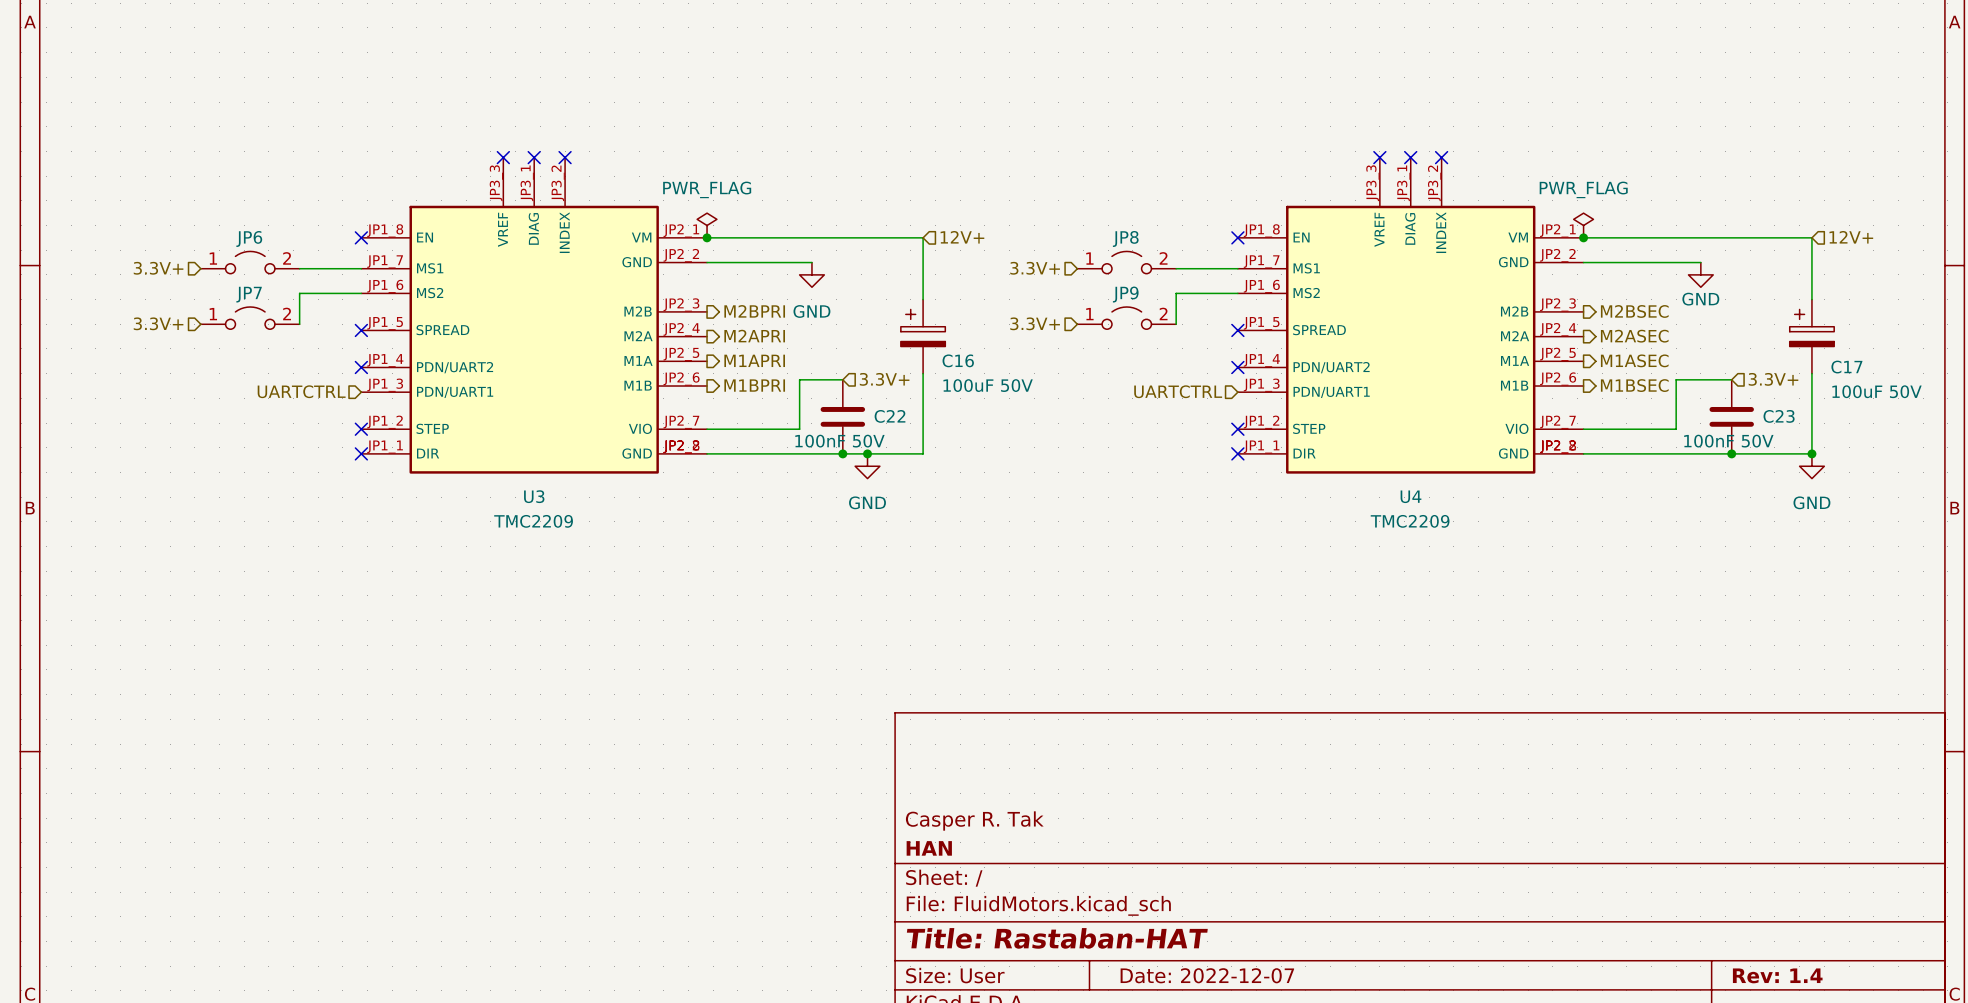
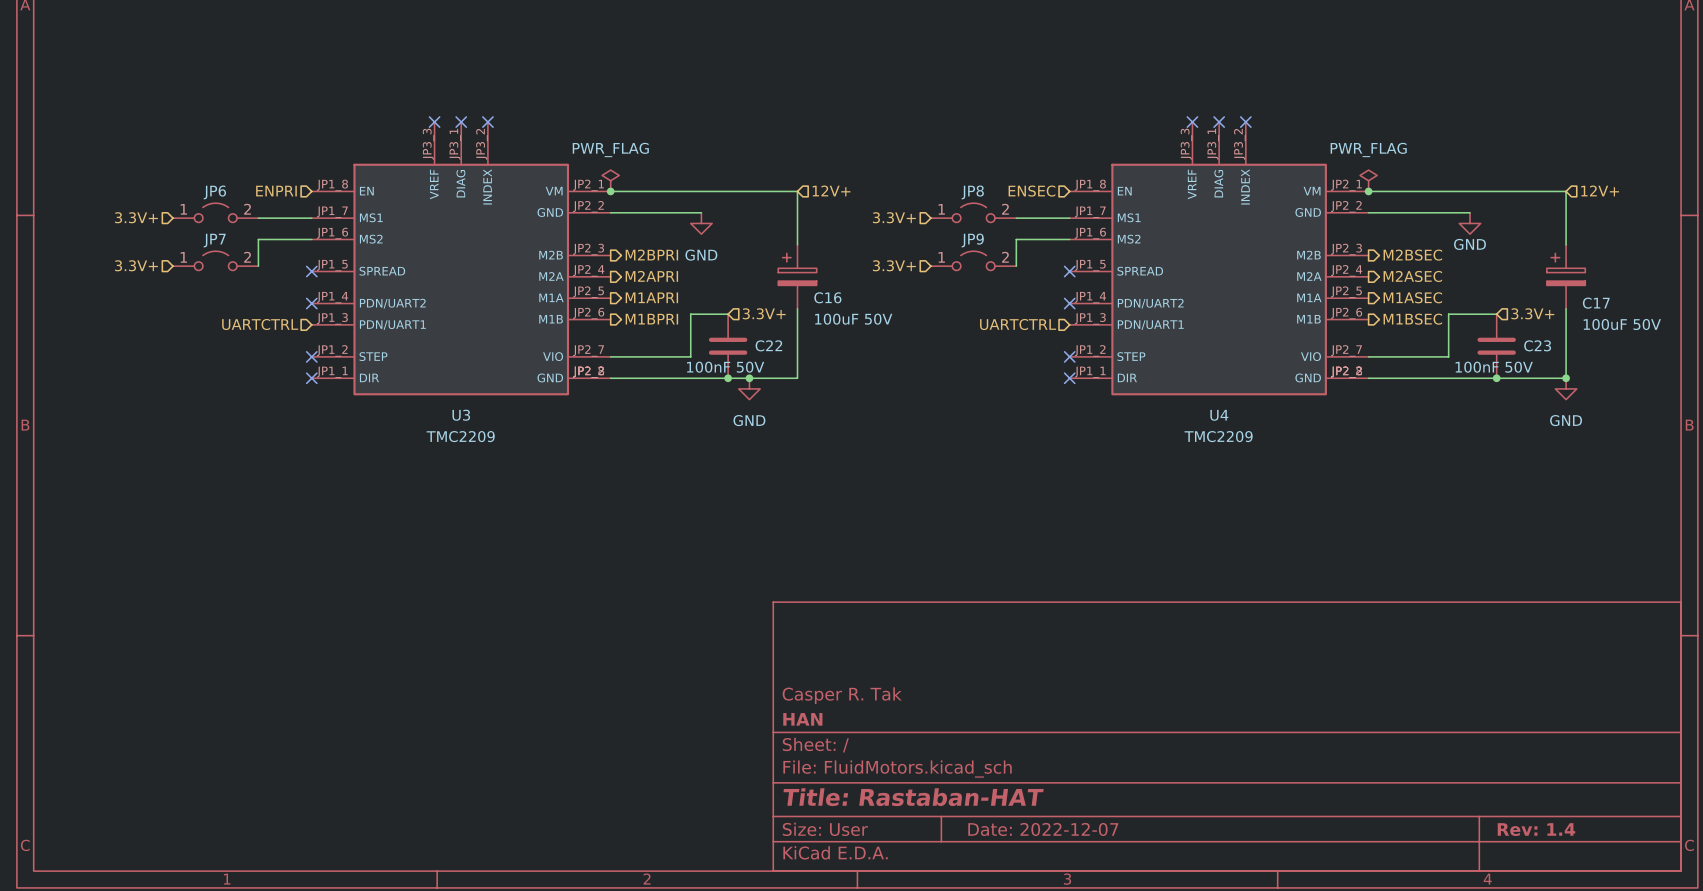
hierarchical label: none -> ENPRI (276, 191)
no-connect mark: (361, 237) -> none
hierarchical label: none -> ENSEC (1031, 191)
no-connect mark: (1237, 237) -> none

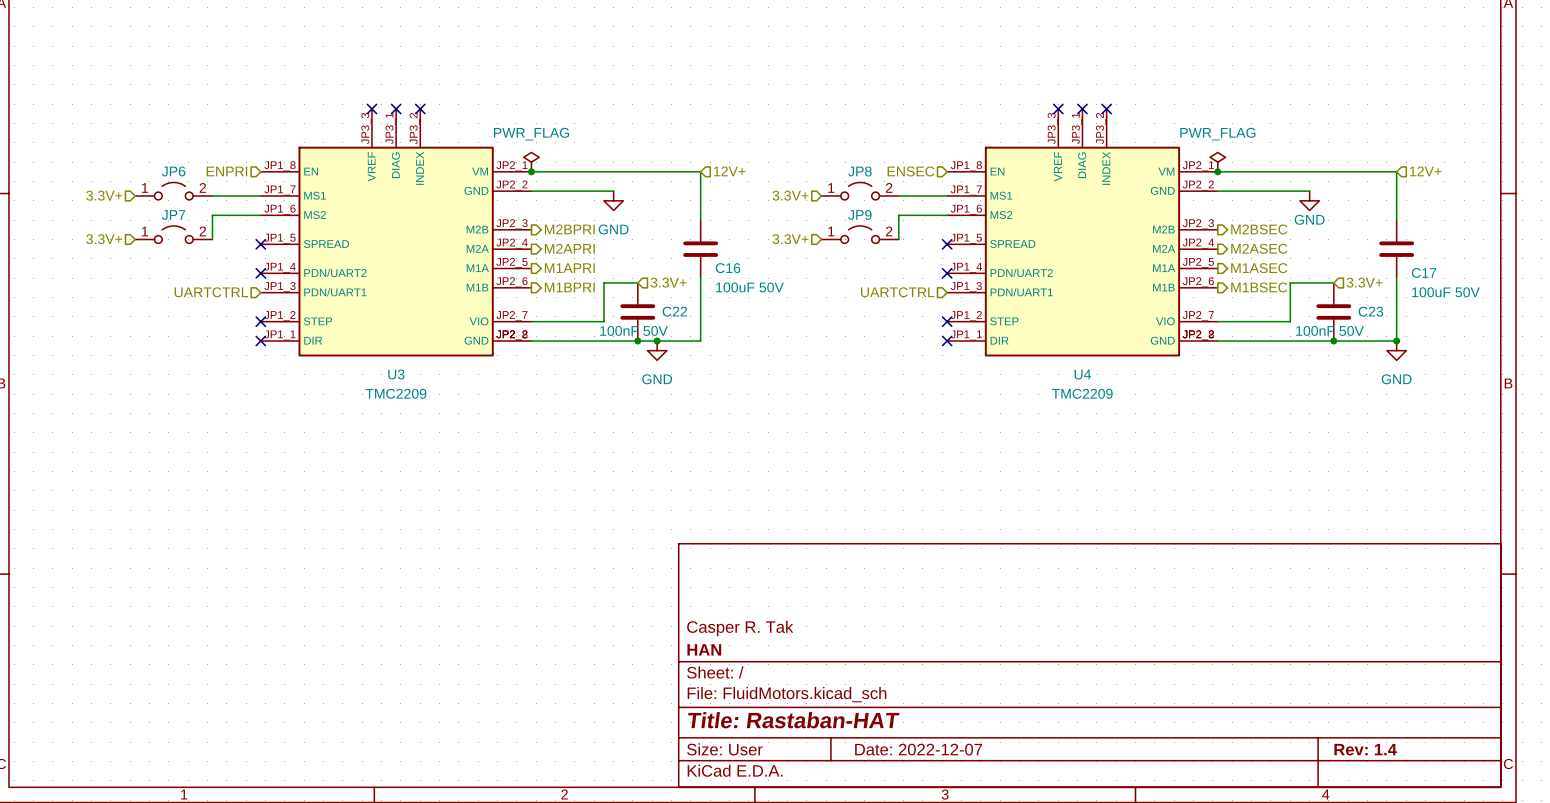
C16 symbol: [778, 244, 817, 309] -> [683, 220, 719, 279]
C17 symbol: [1546, 244, 1586, 309] -> [1379, 220, 1415, 279]

